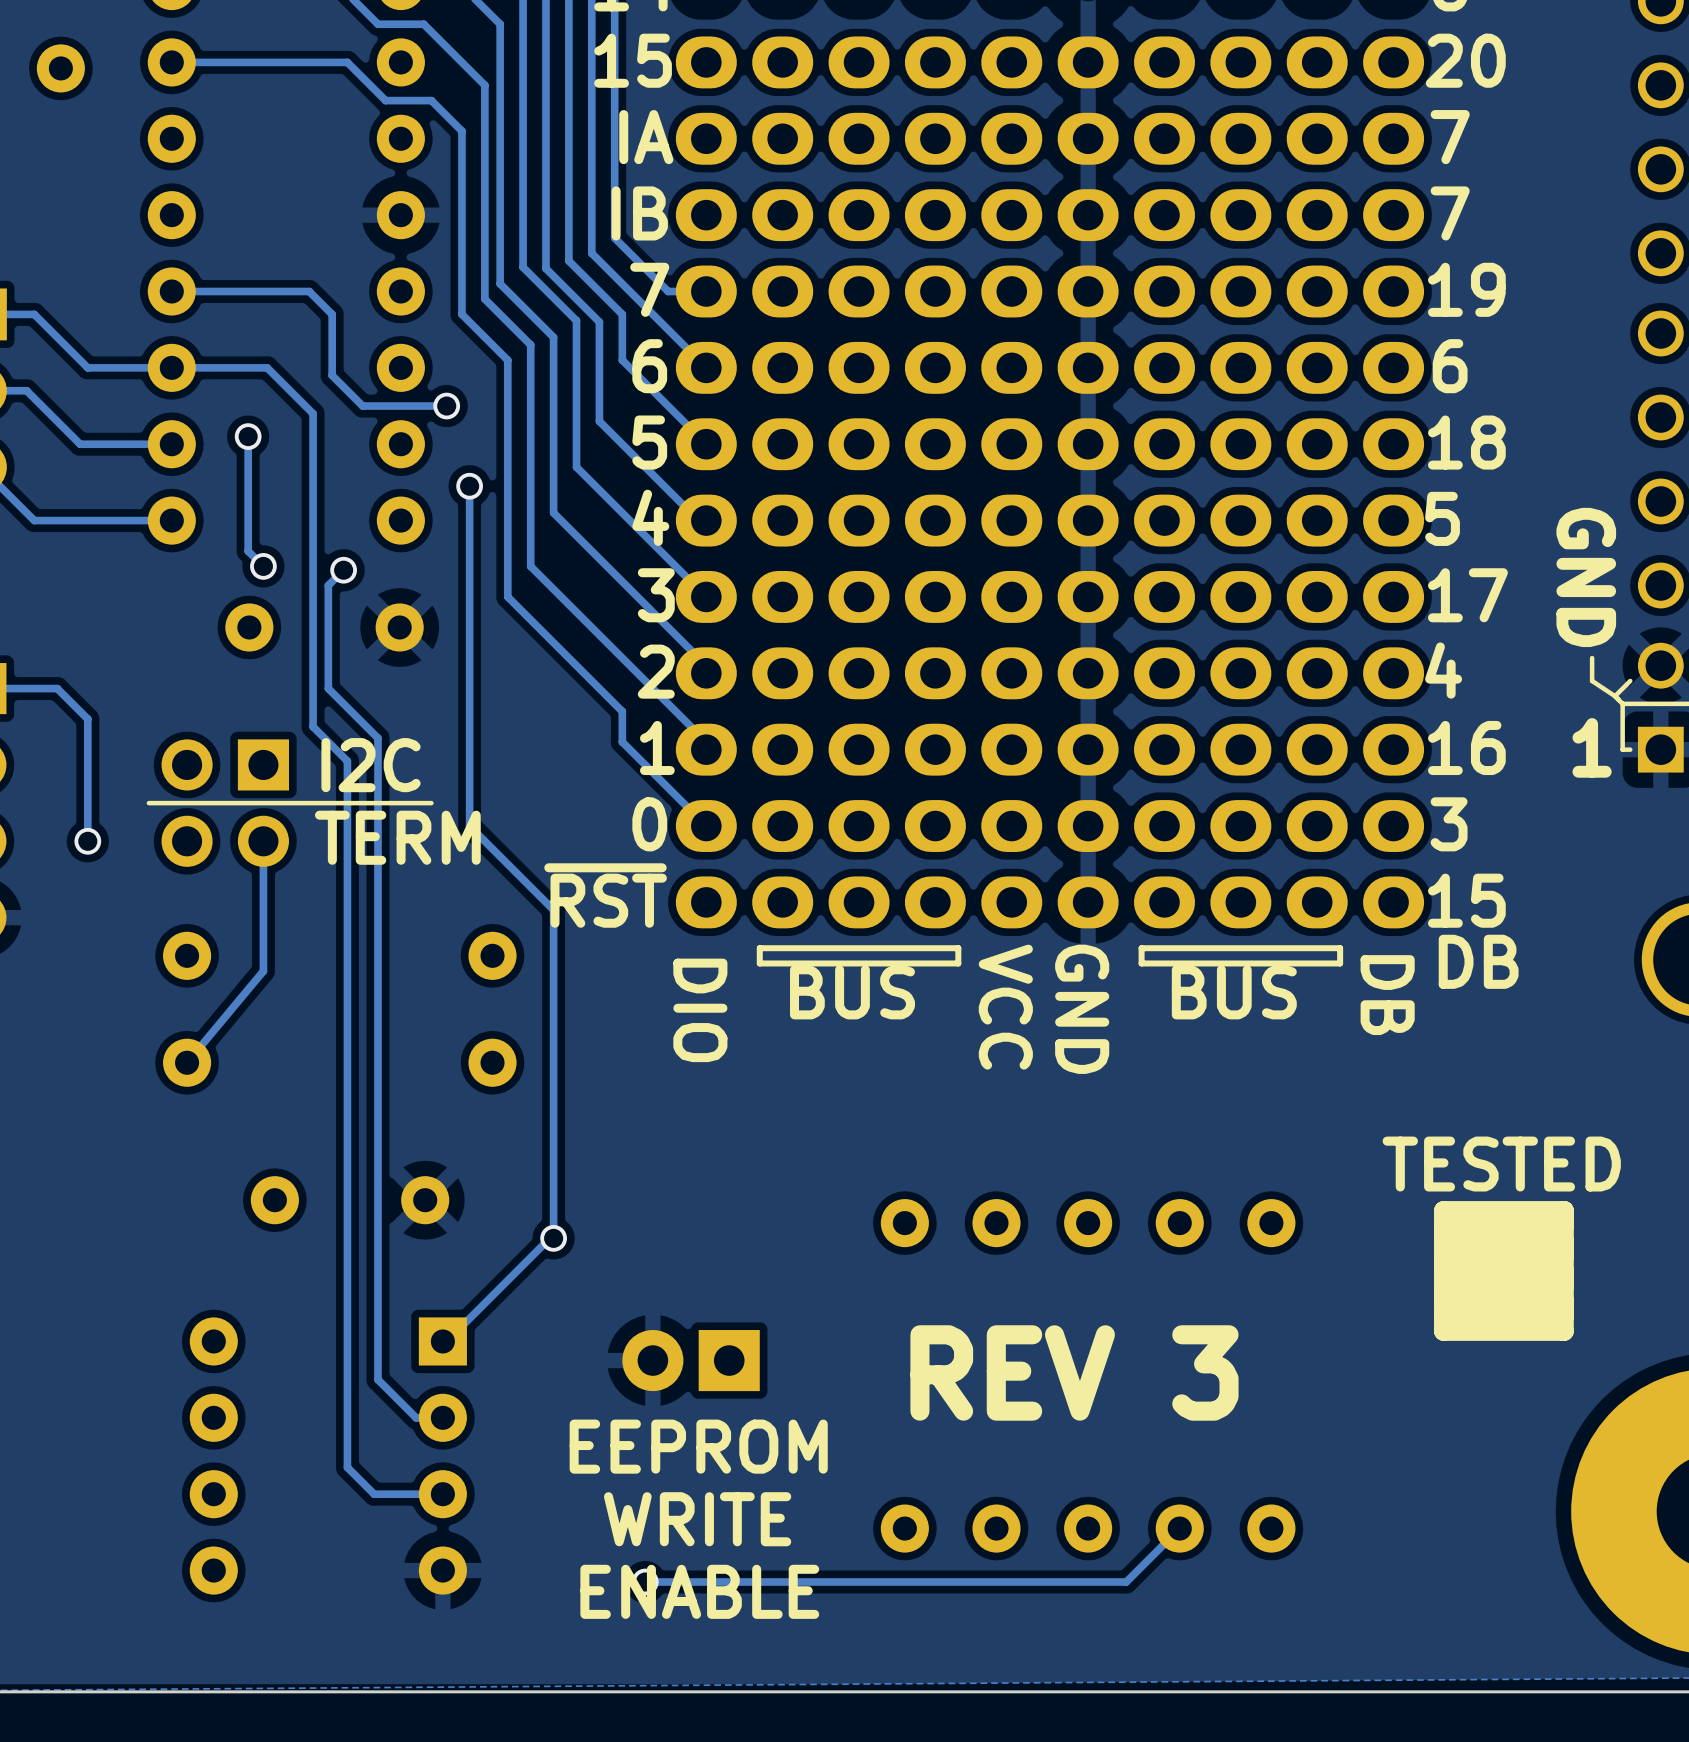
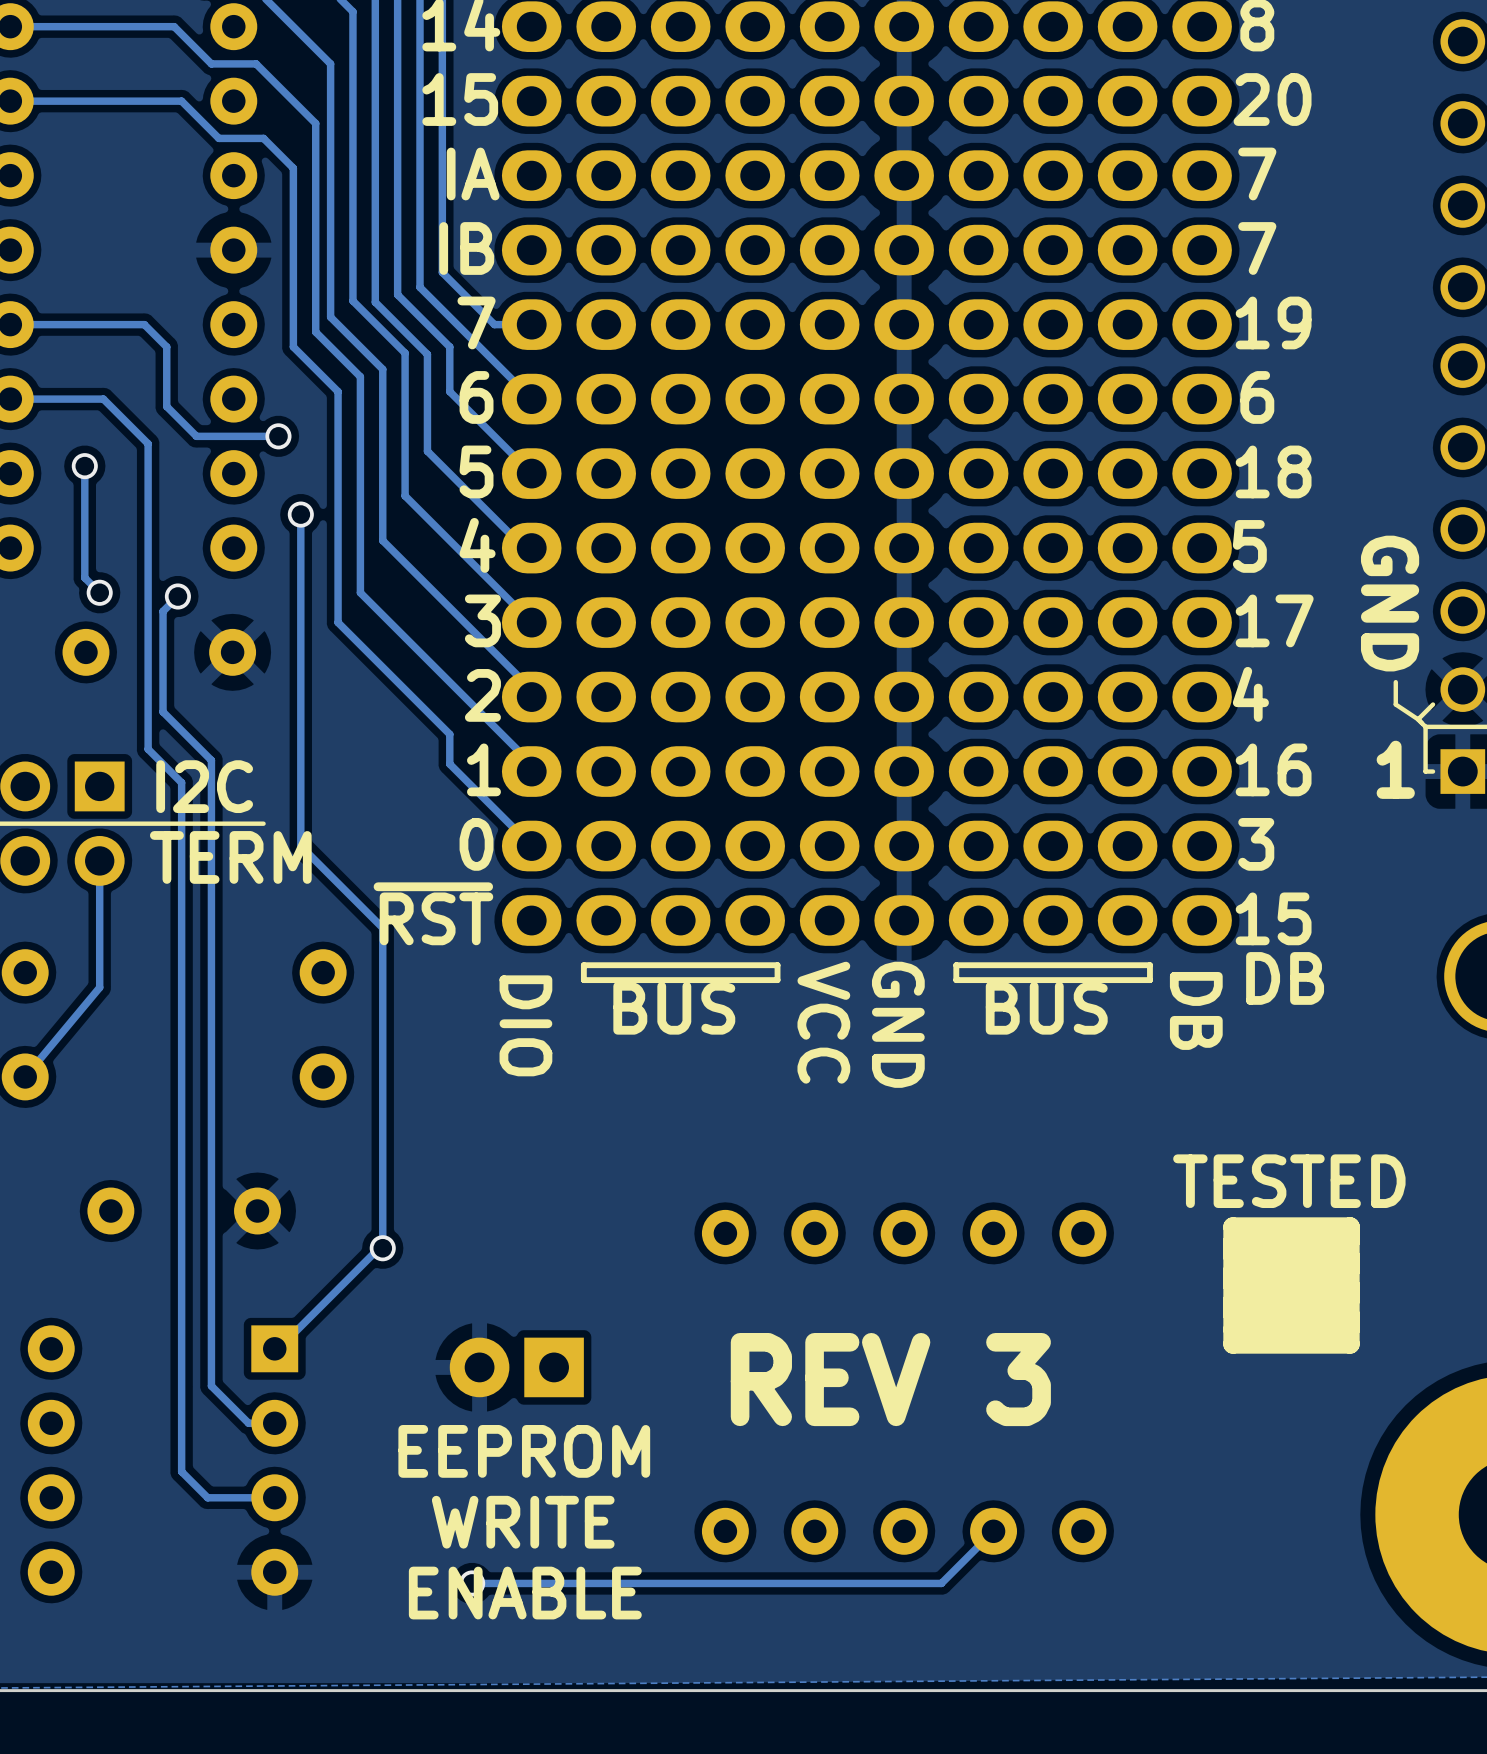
TESTED position: (1503, 1270) -> (1291, 1285)

